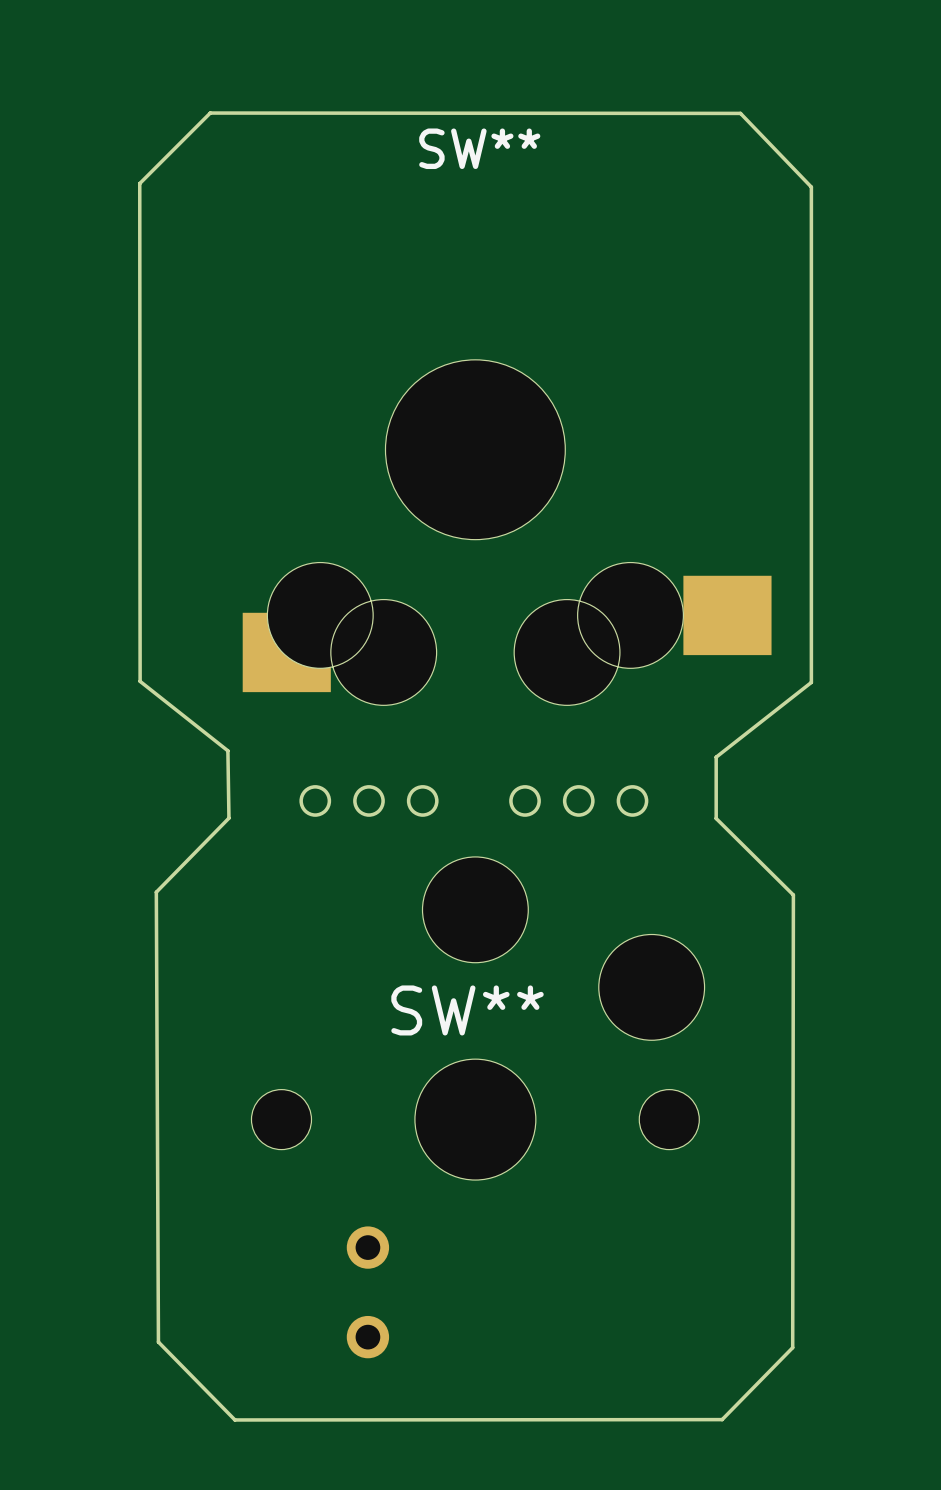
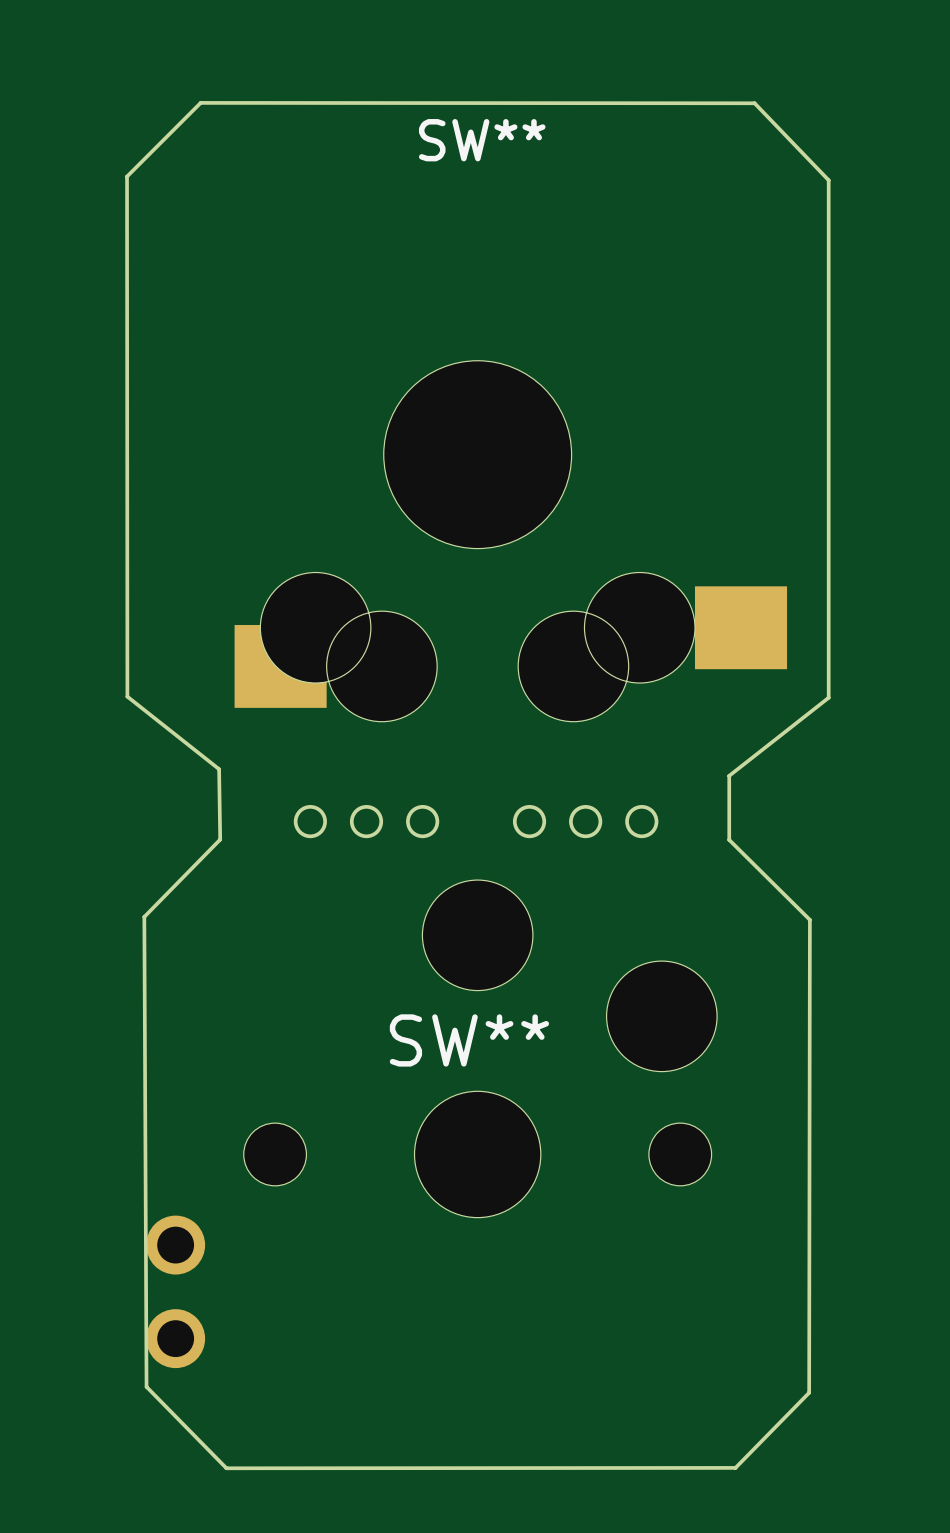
SW**: none -> (431, 1124)
SW**: (478, 1107) -> none

